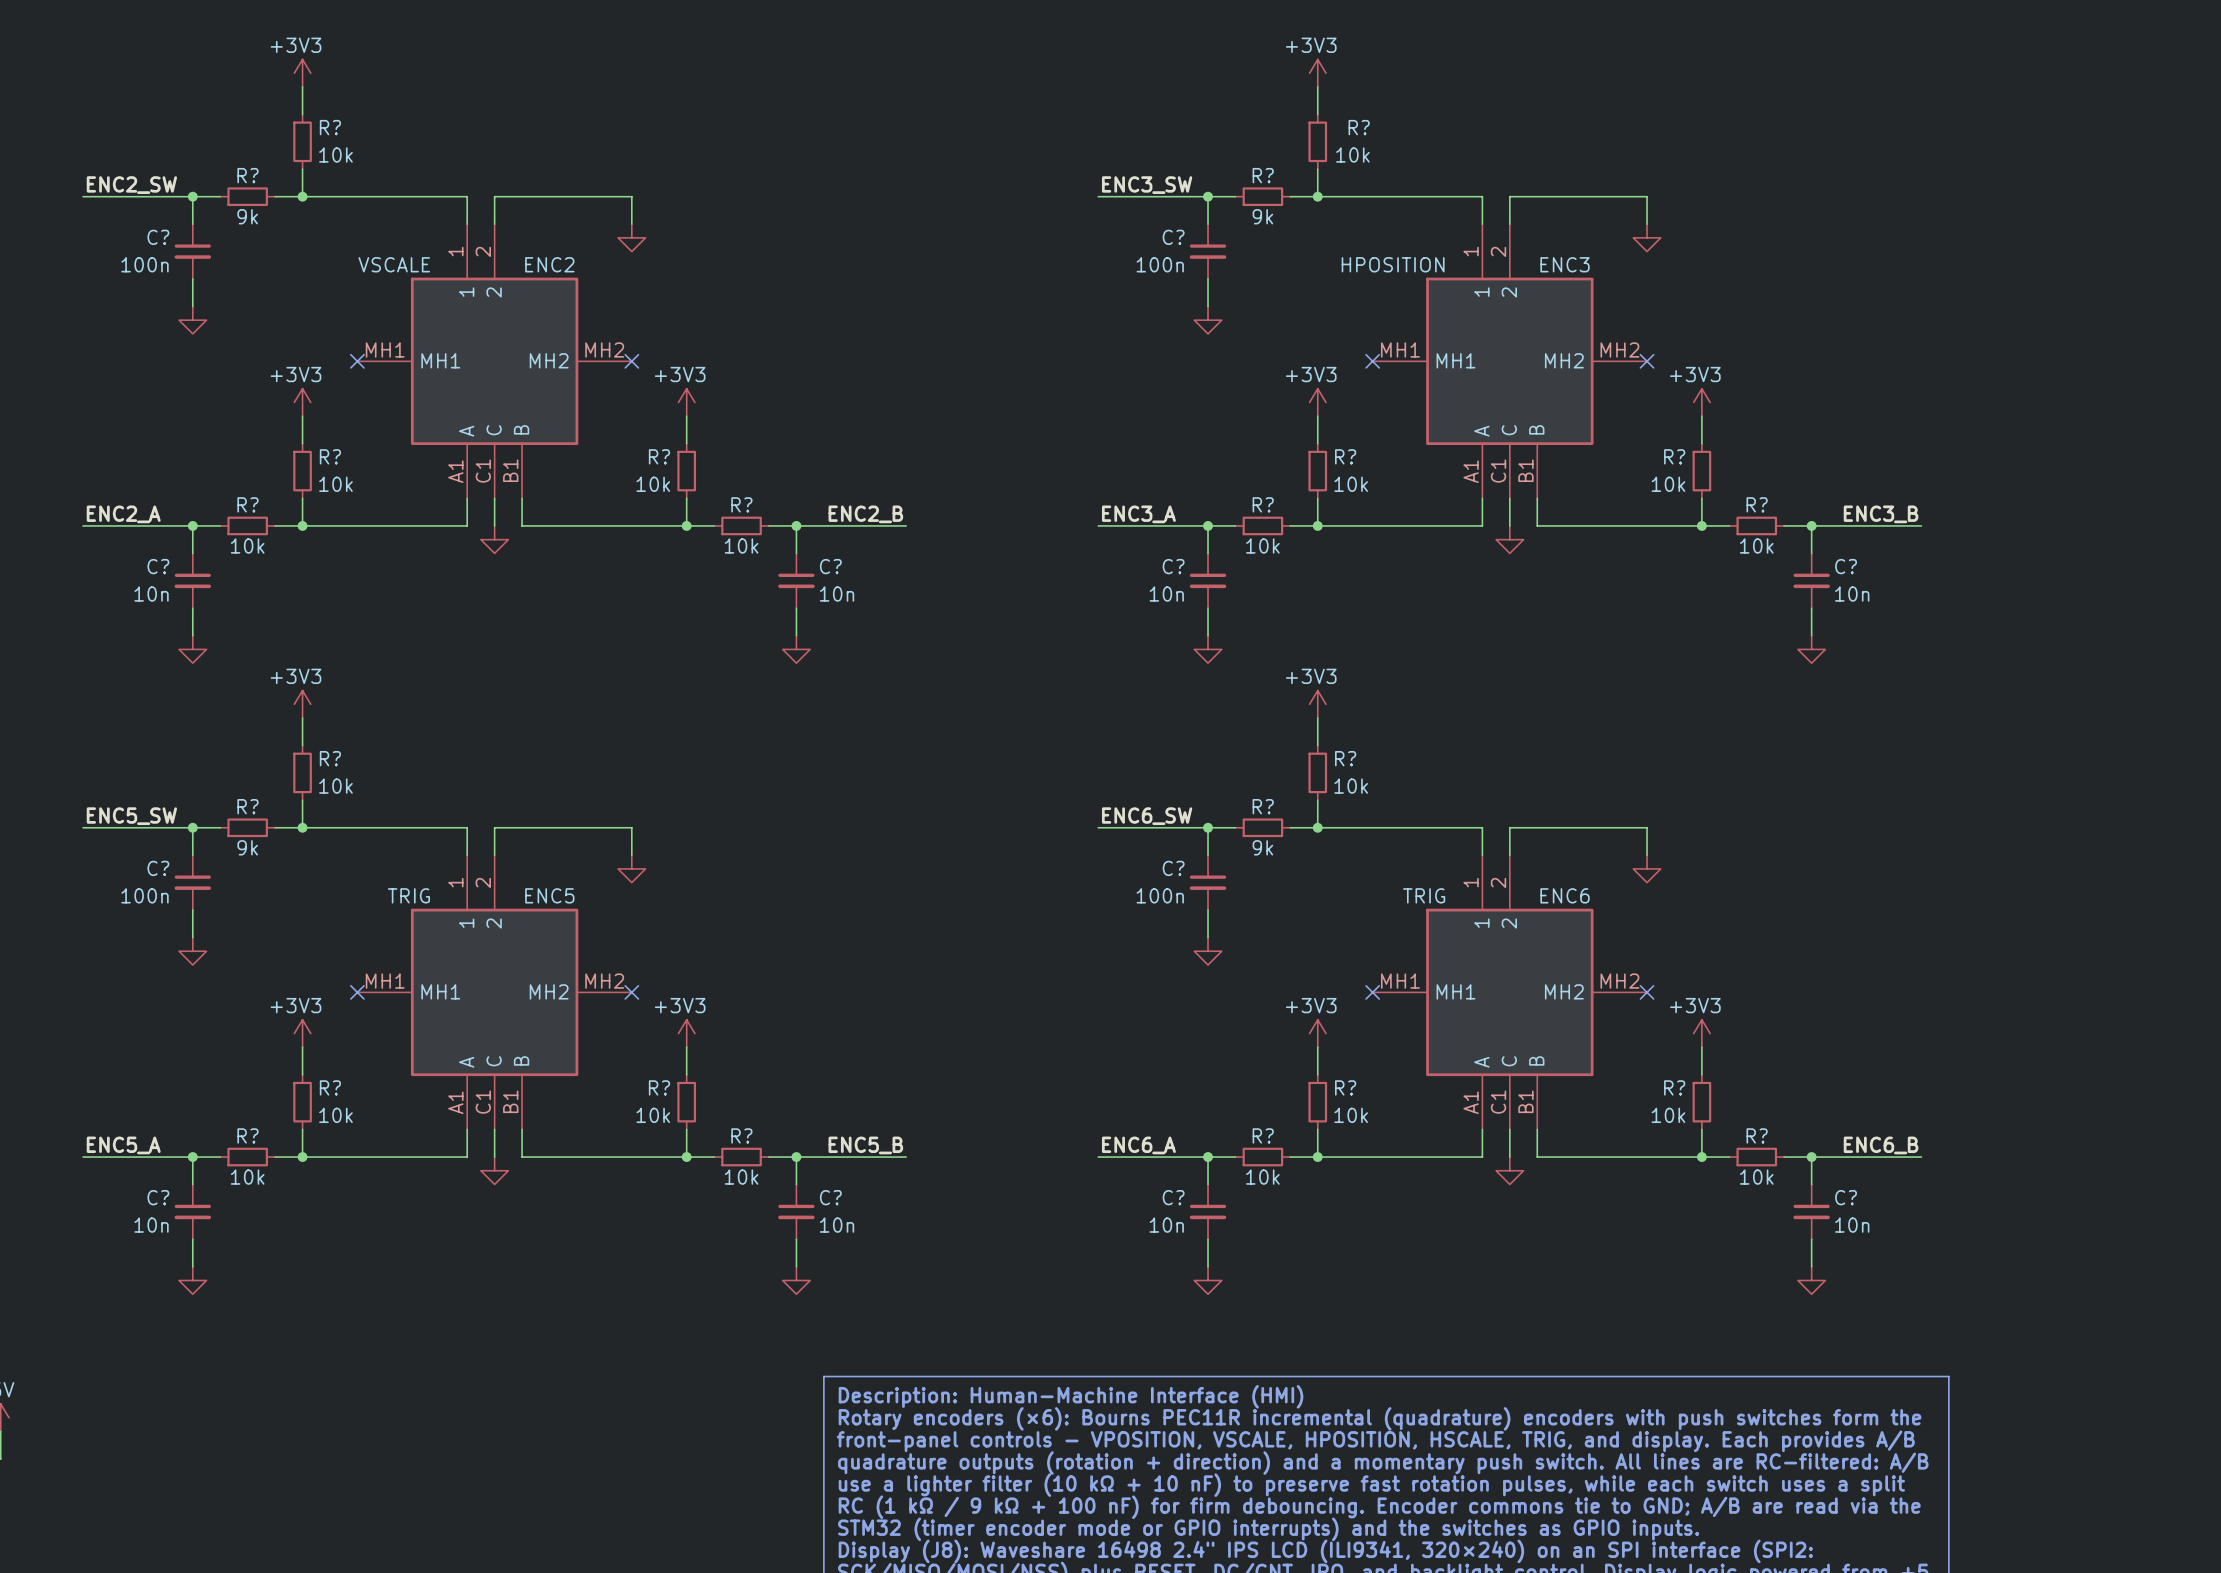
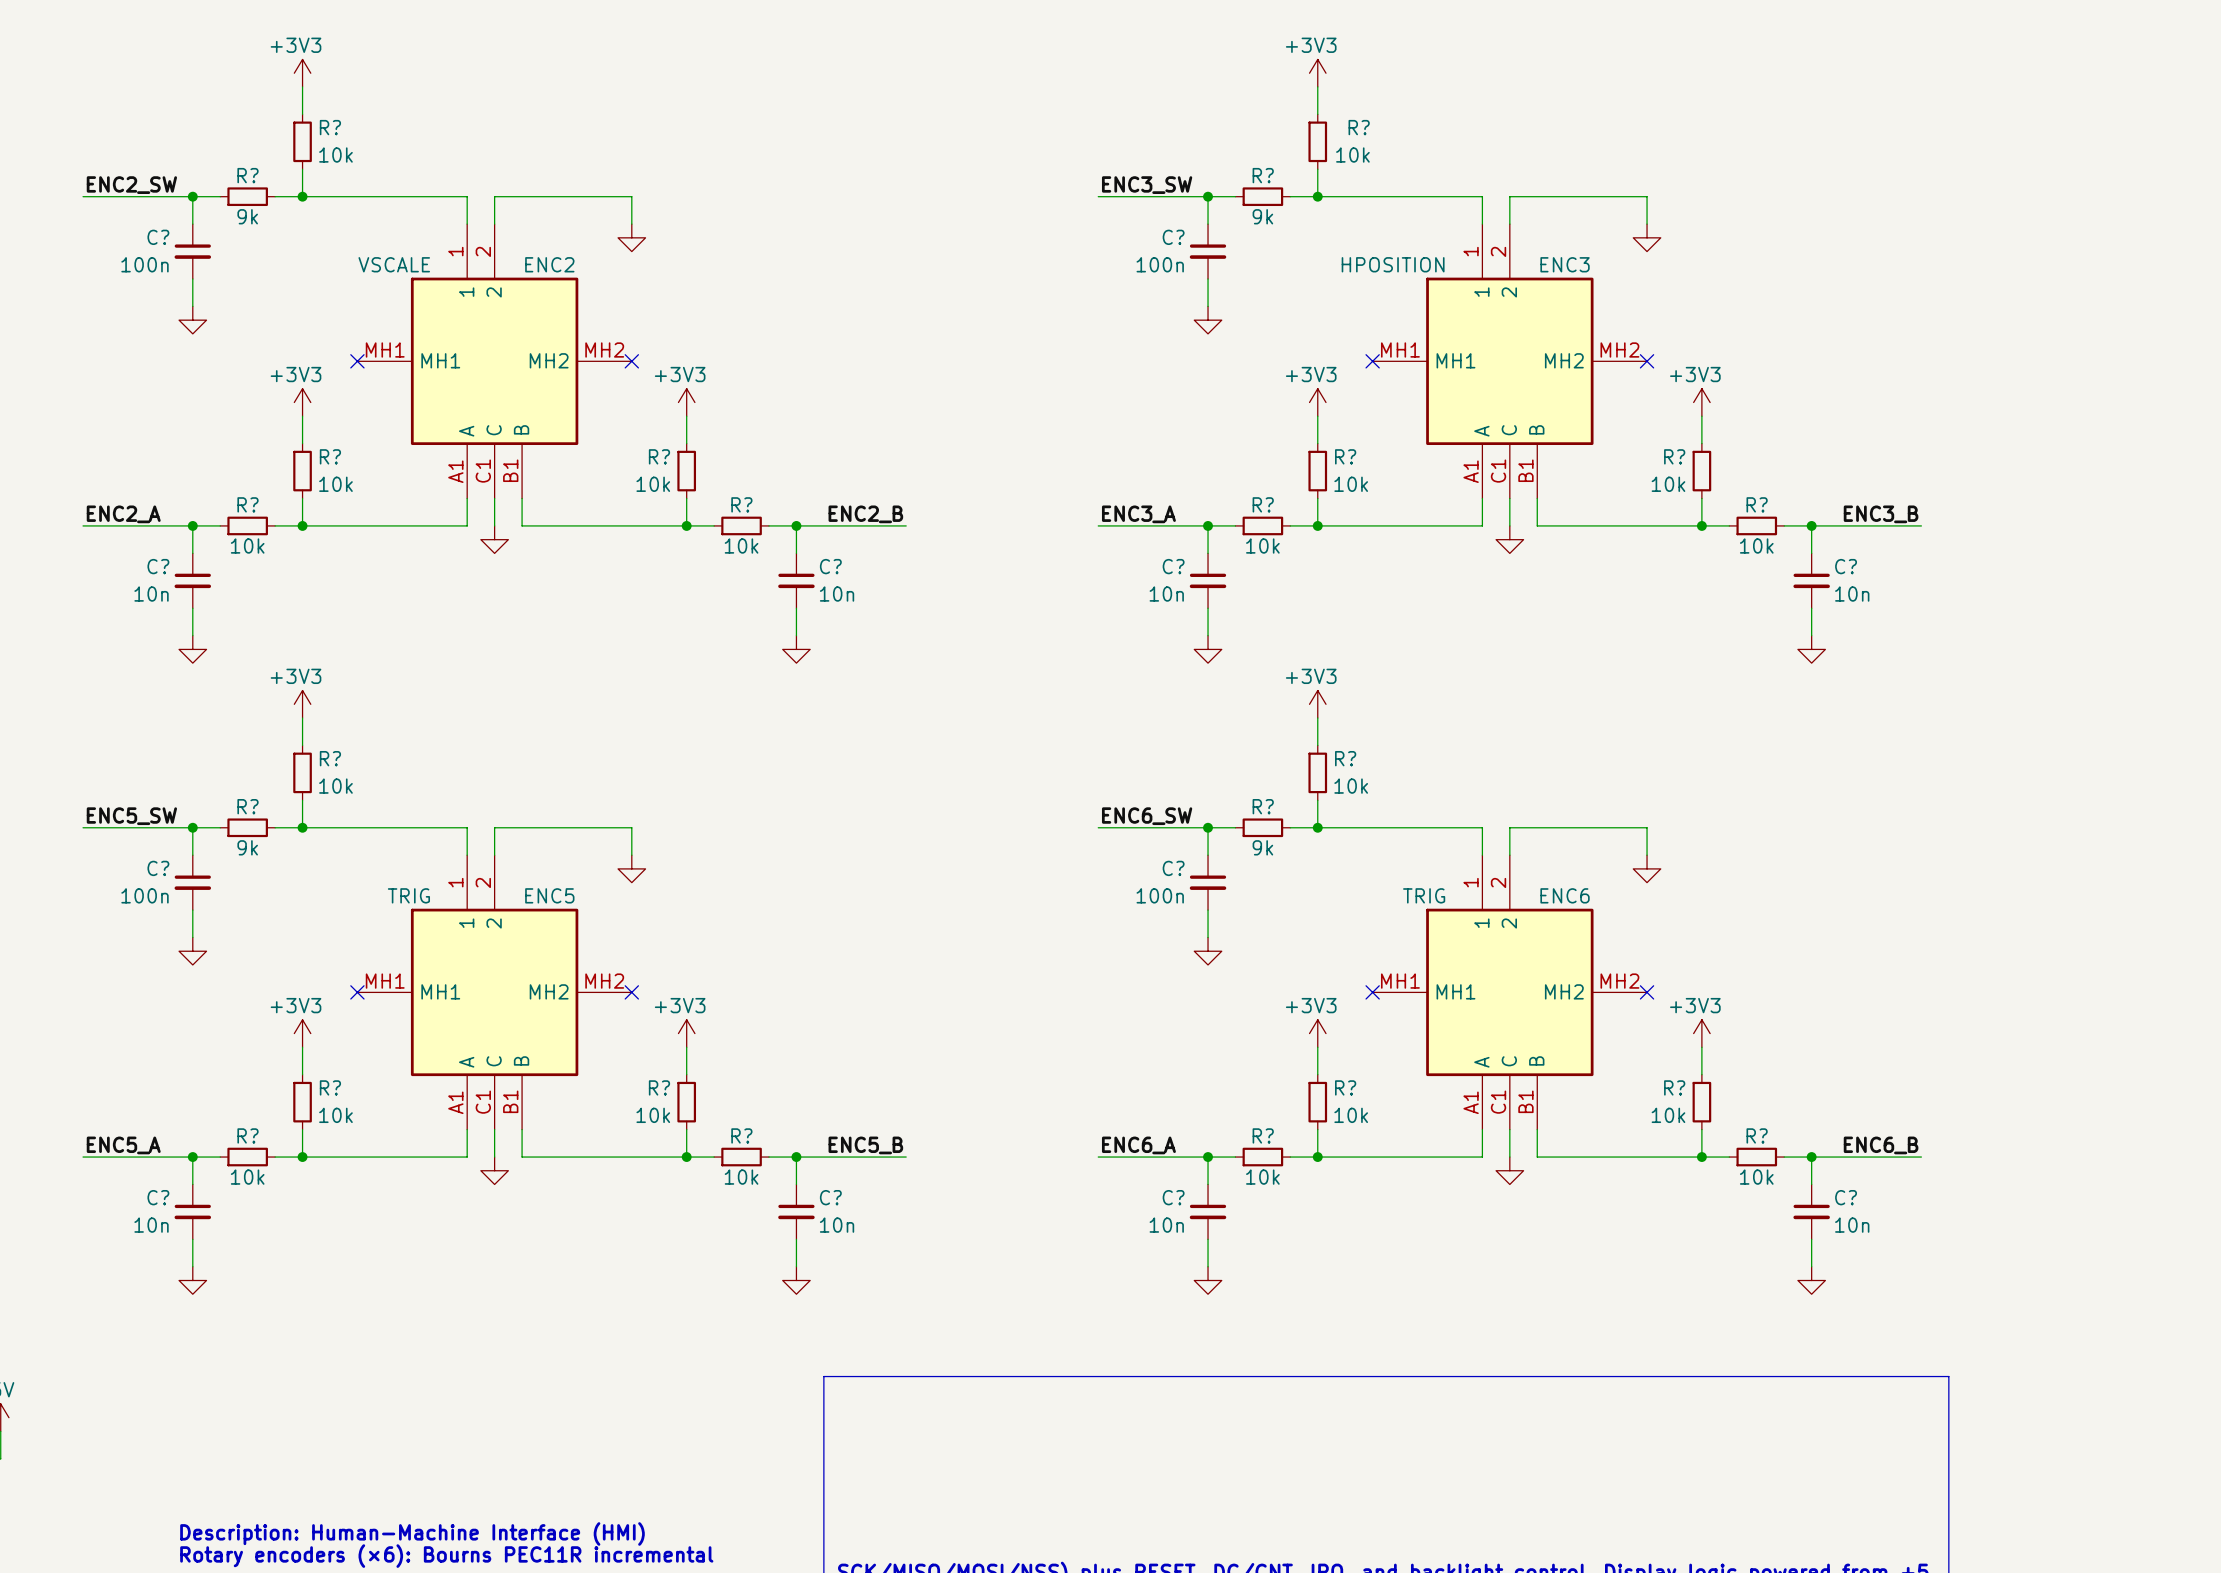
text: Description: Human-Machine Interface (HMI) (1071, 1396) -> none
text: Rotary encoders (×6): Bourns PEC11R incremental (quadrature) encoders with push switches form the (1380, 1418) -> none
text: front-panel controls - VPOSITION, VSCALE, HPOSITION, HSCALE, TRIG, and display. Each provides A/B (1375, 1441) -> none
text: quadrature outputs (rotation + direction) and a momentary push switch. All lines are RC-filtered: A/B (1383, 1463) -> none
text: use a lighter filter (10 kΩ + 10 nF) to preserve fast rotation pulses, while each switch uses a split (1371, 1485) -> none
text: RC (1 kΩ / 9 kΩ + 100 nF) for firm debouncing. Encoder commons tie to GND; A/B are read via the (1379, 1507) -> none
text: STM32 (timer encoder mode or GPIO interrupts) and the switches as GPIO inputs. (1268, 1529) -> none
text: none -> Description: Human-Machine Interface (HMI) (412, 1533)
text: Display (J8): Waveshare 16498 2.4" IPS LCD (ILI9341, 320×240) on an SPI interface (SPI2: (1325, 1551) -> none
text: none -> Rotary encoders (×6): Bourns PEC11R incremental (446, 1556)

